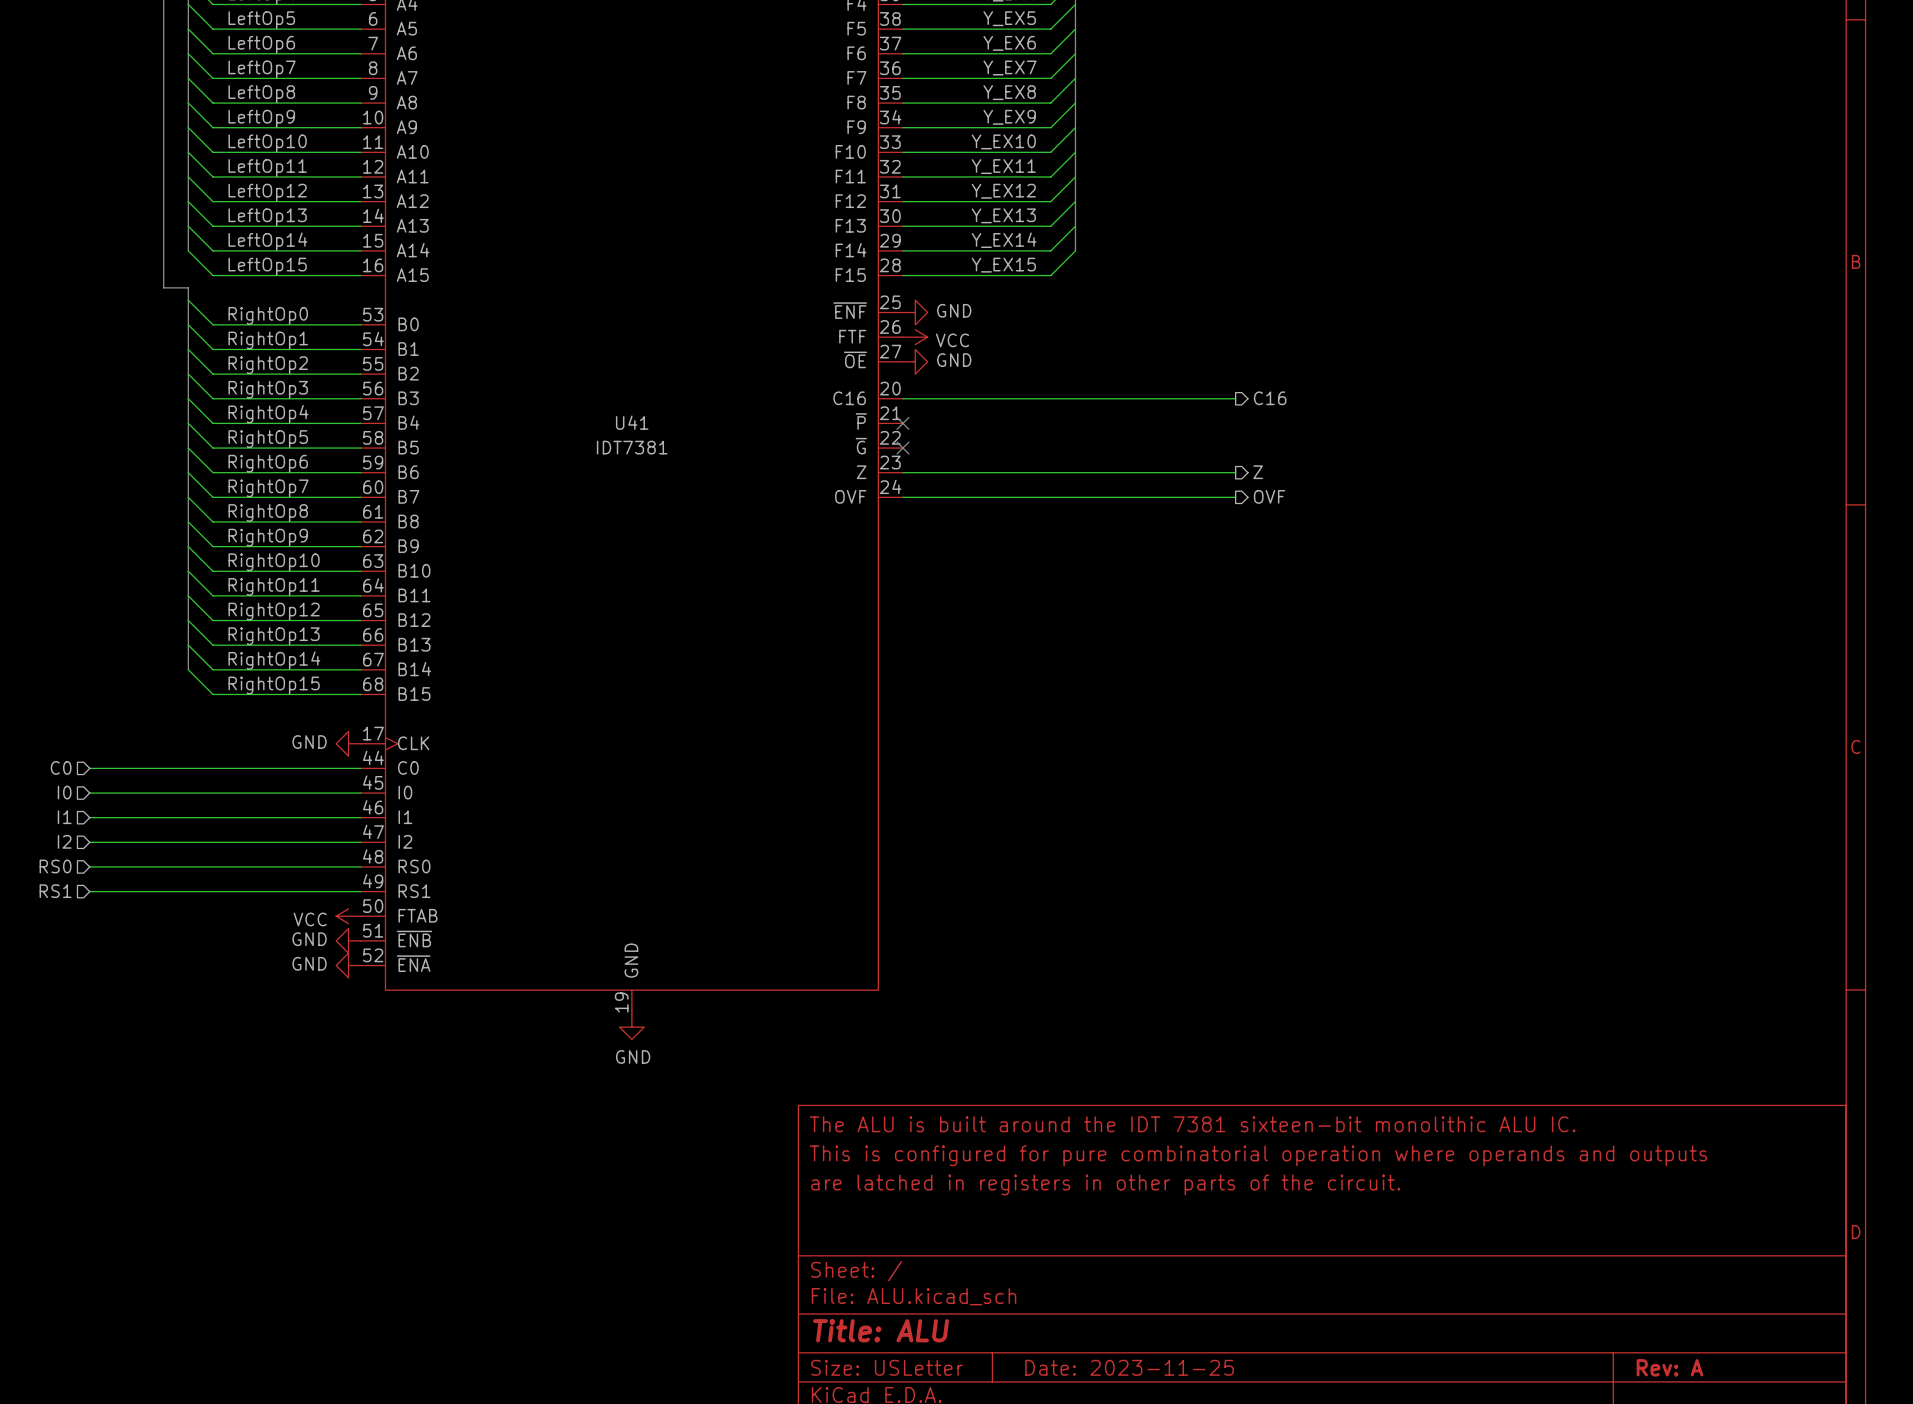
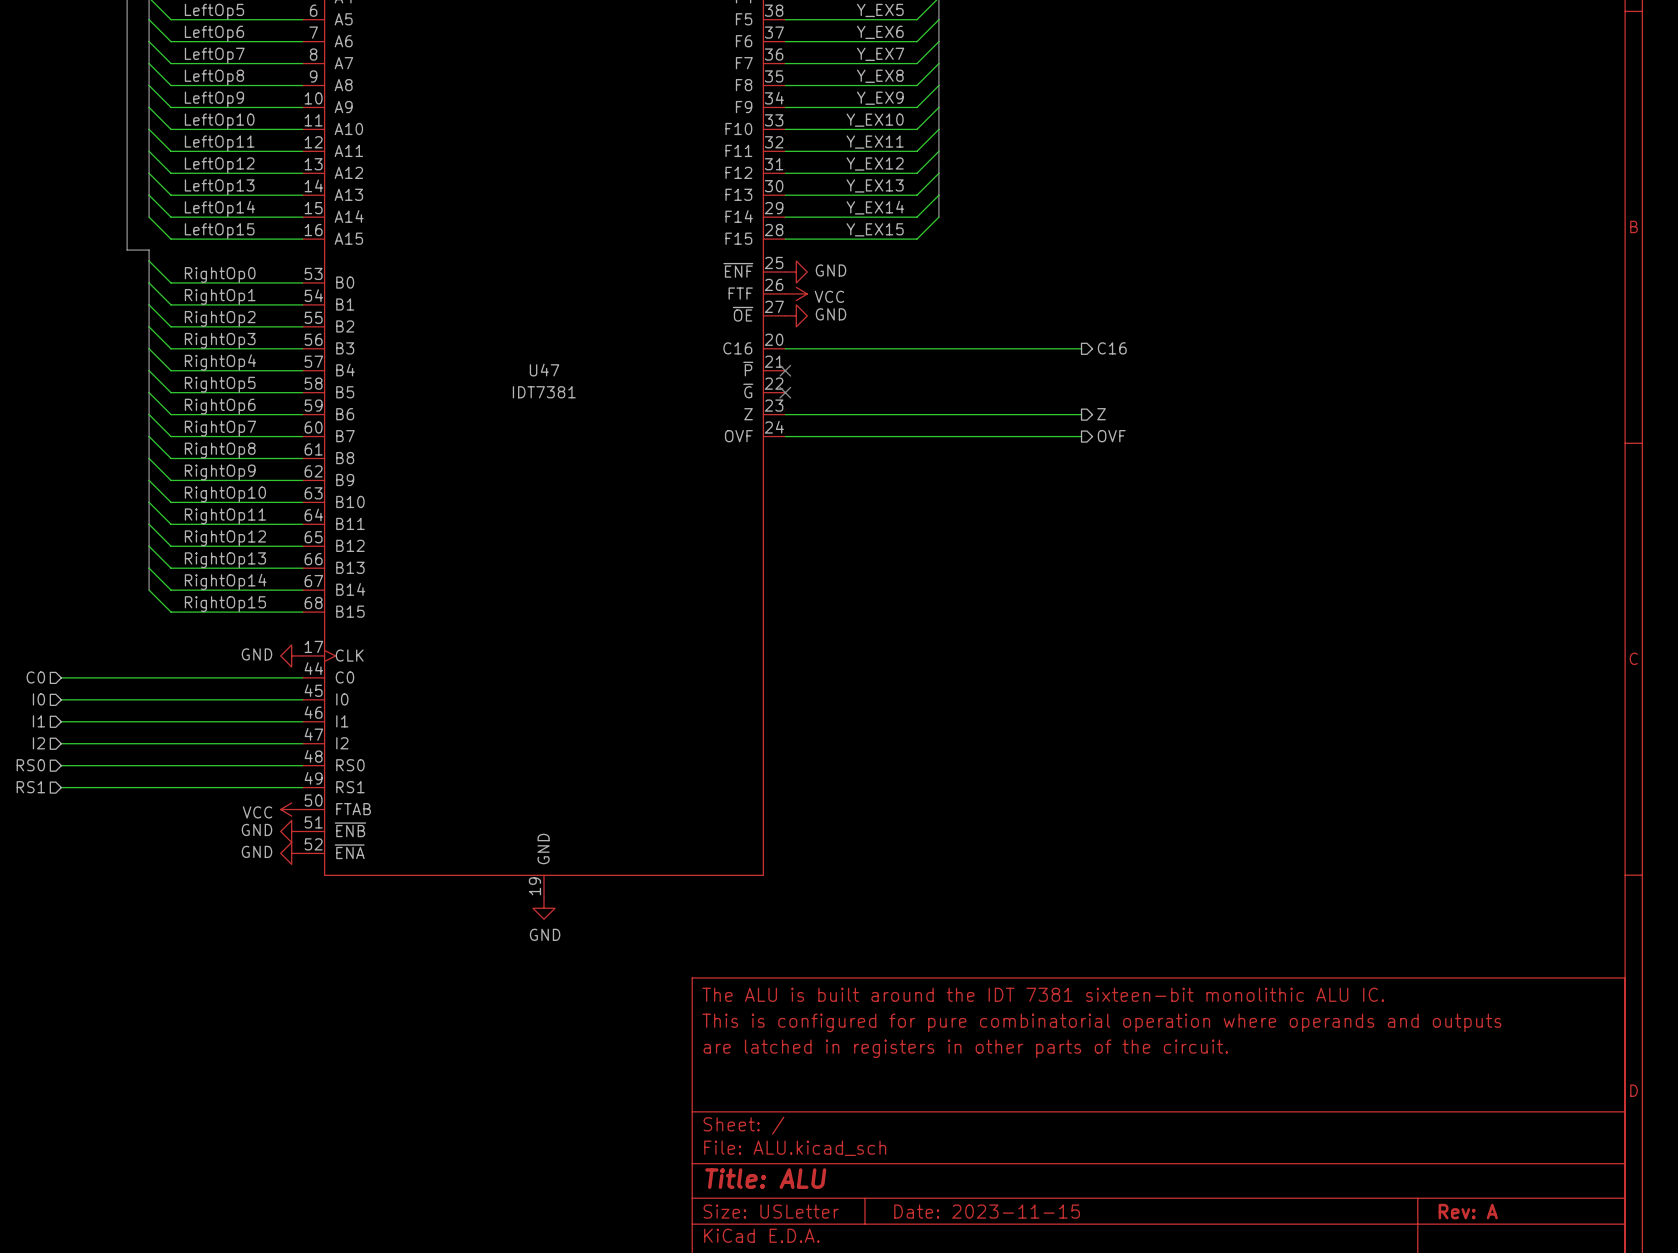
U41 name: U41 (632, 422) -> U47 (544, 370)
title block: Date: 2023-11-25 (1129, 1367) -> Date: 2023-11-15 (987, 1211)

